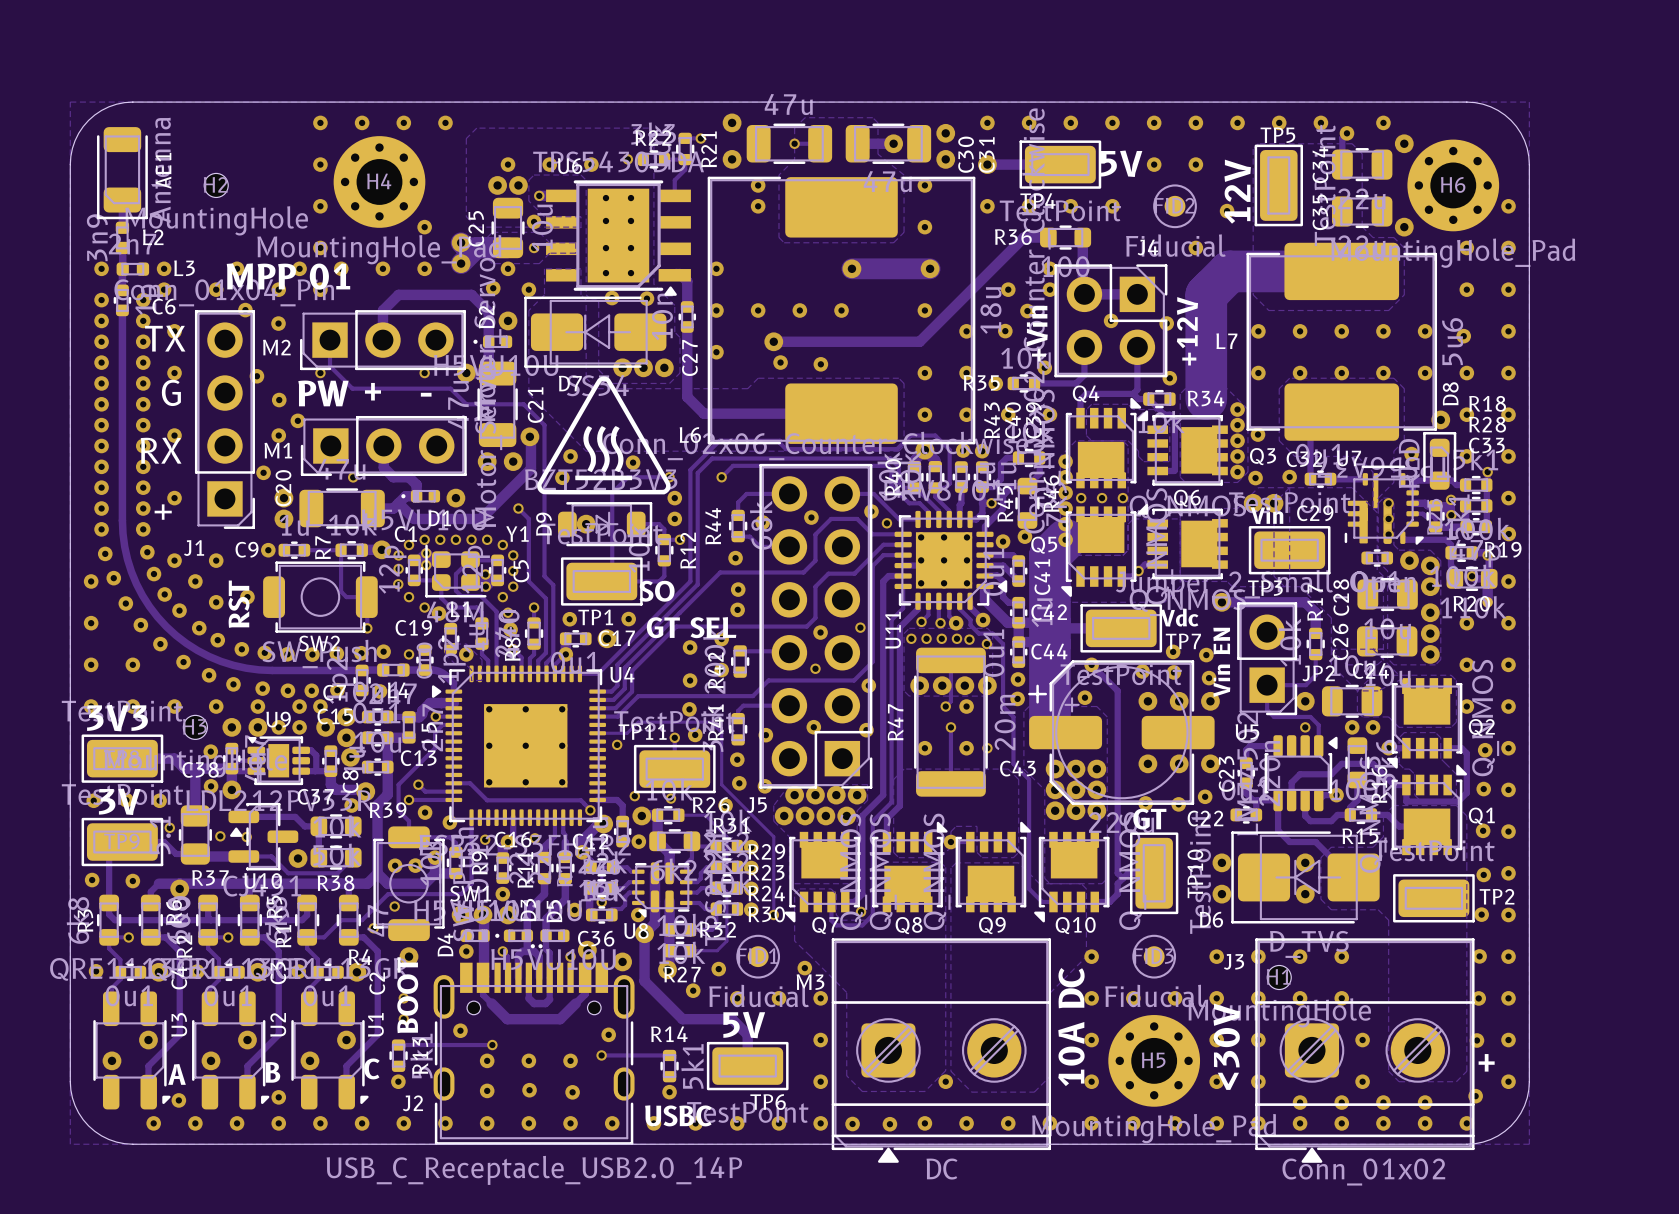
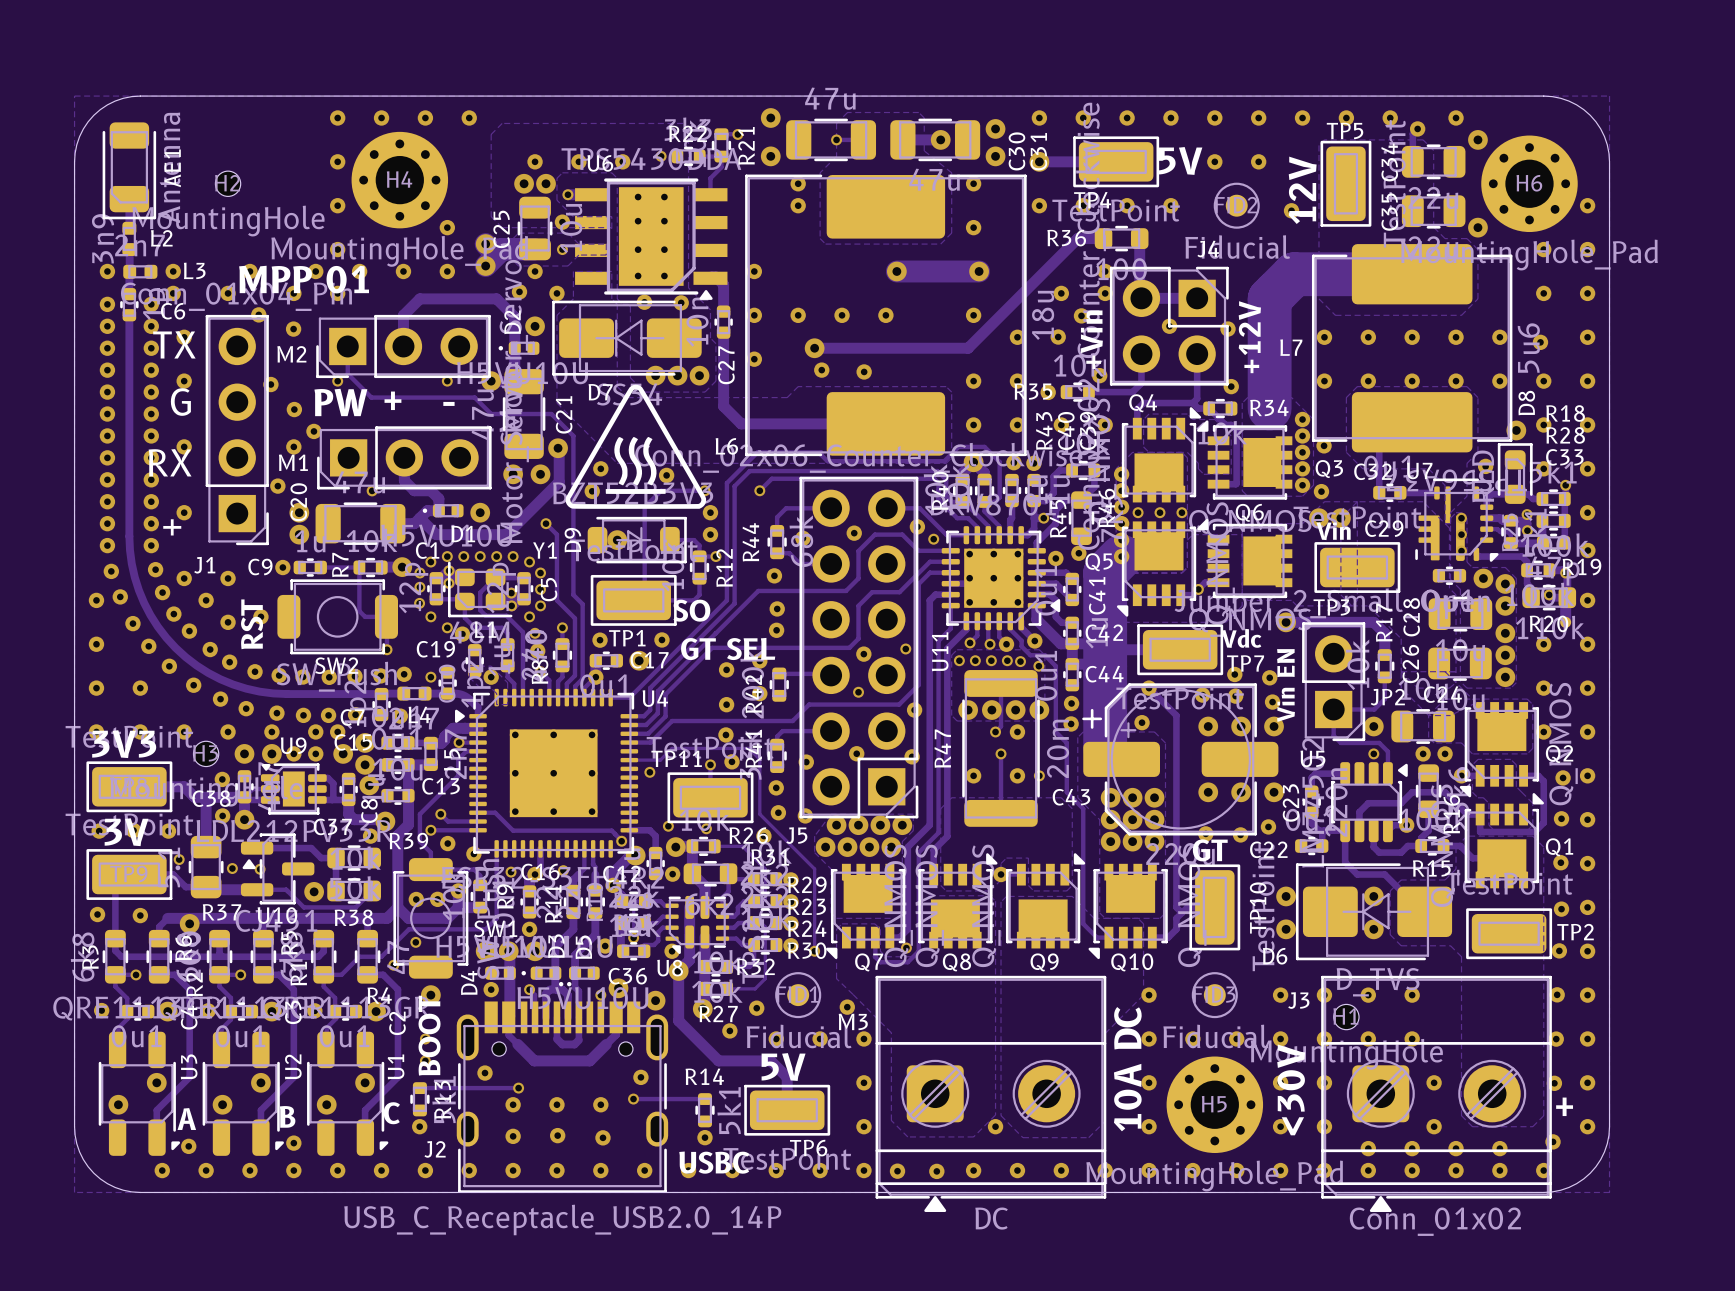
via: (1195, 247) -> none
via: (1289, 477) -> none

